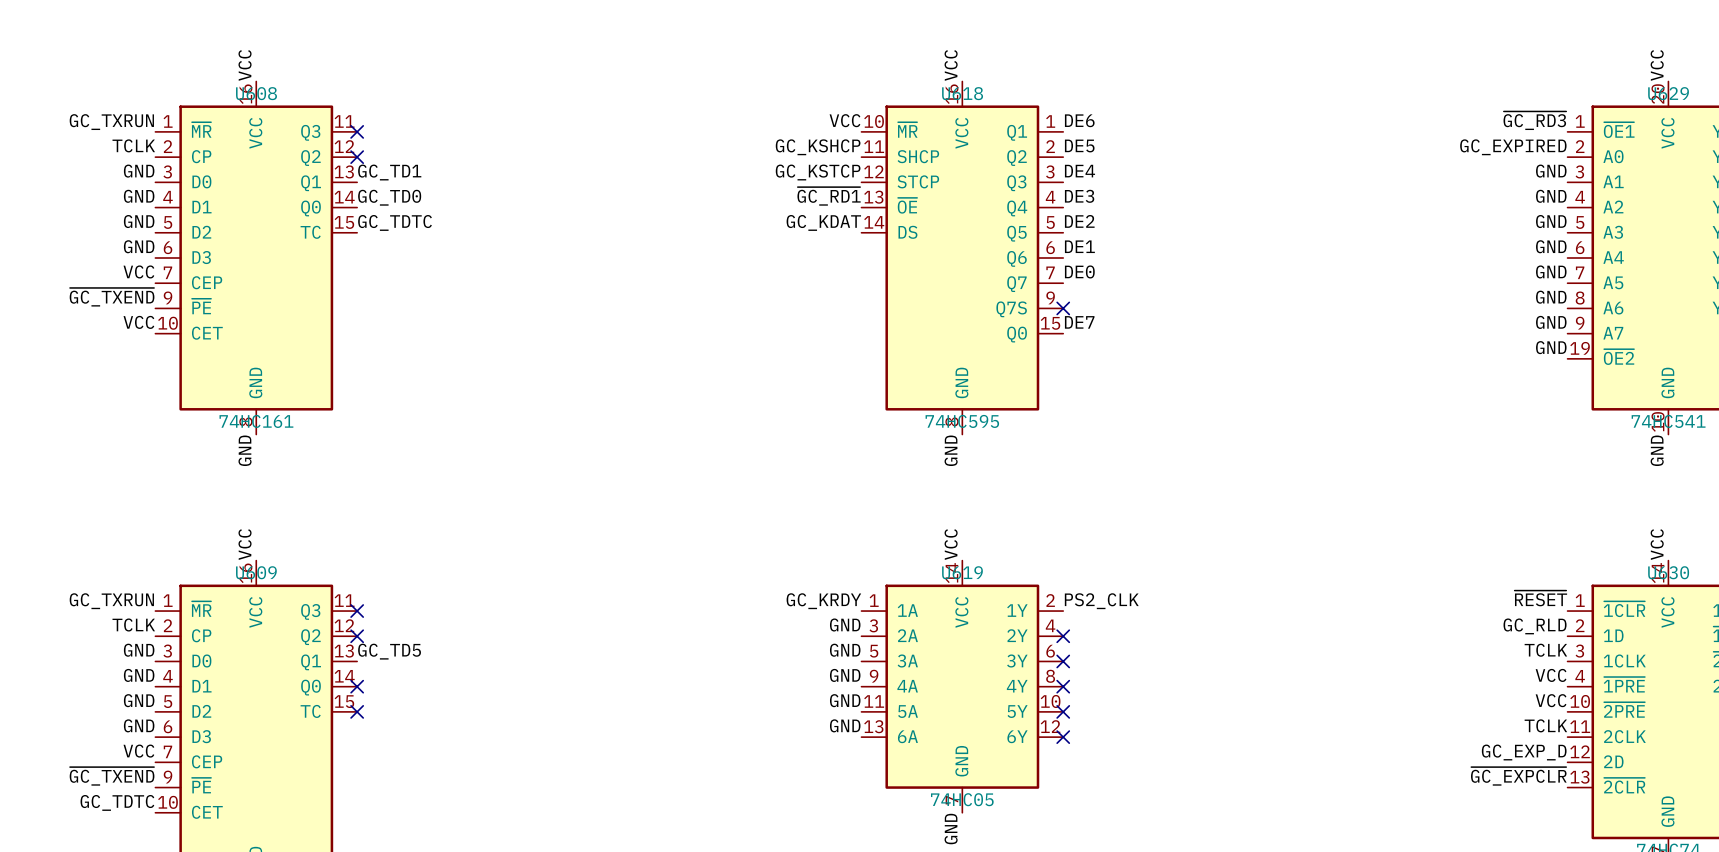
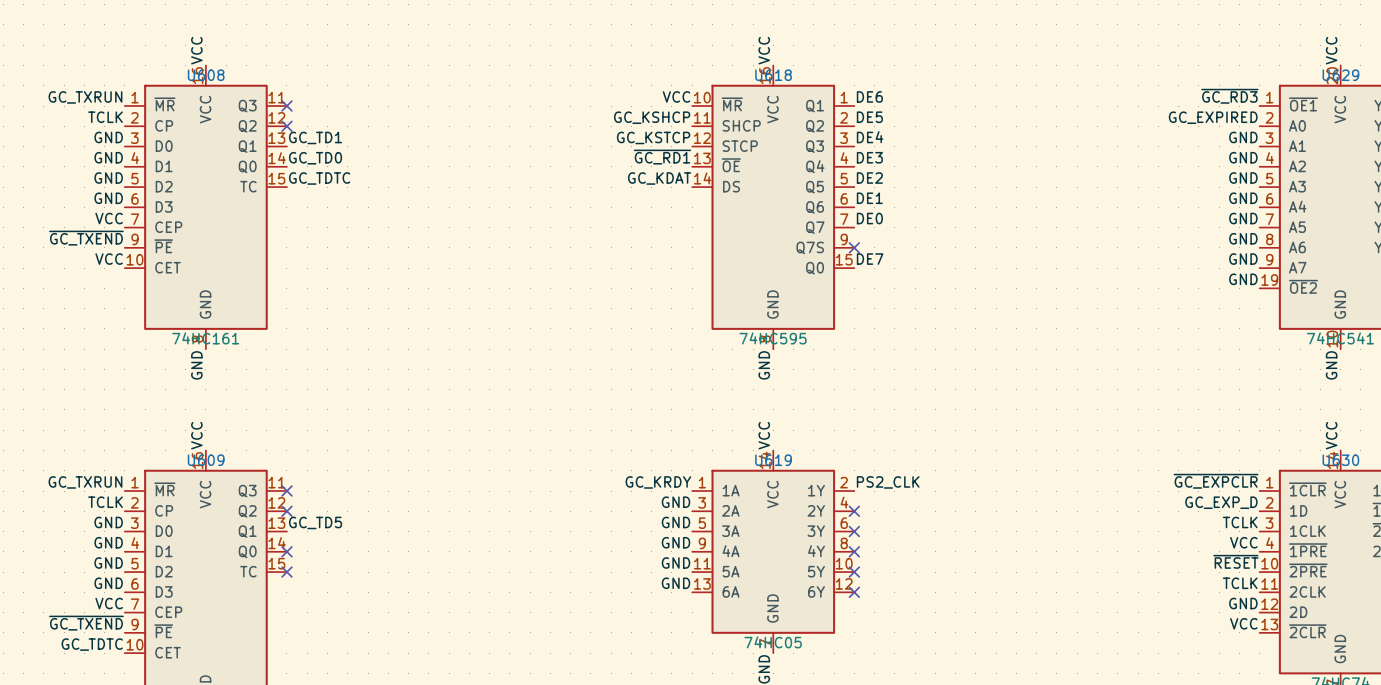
label: ~{RESET} (1540, 598) -> ~{GC_EXPCLR} (1216, 481)
label: GC_RLD (1535, 626) -> GC_EXP_D (1221, 502)
label: VCC (1551, 700) -> ~{RESET} (1235, 561)
label: GC_EXP_D (1524, 752) -> GND (1243, 603)
label: ~{GC_EXPCLR} (1518, 776) -> VCC (1243, 623)

